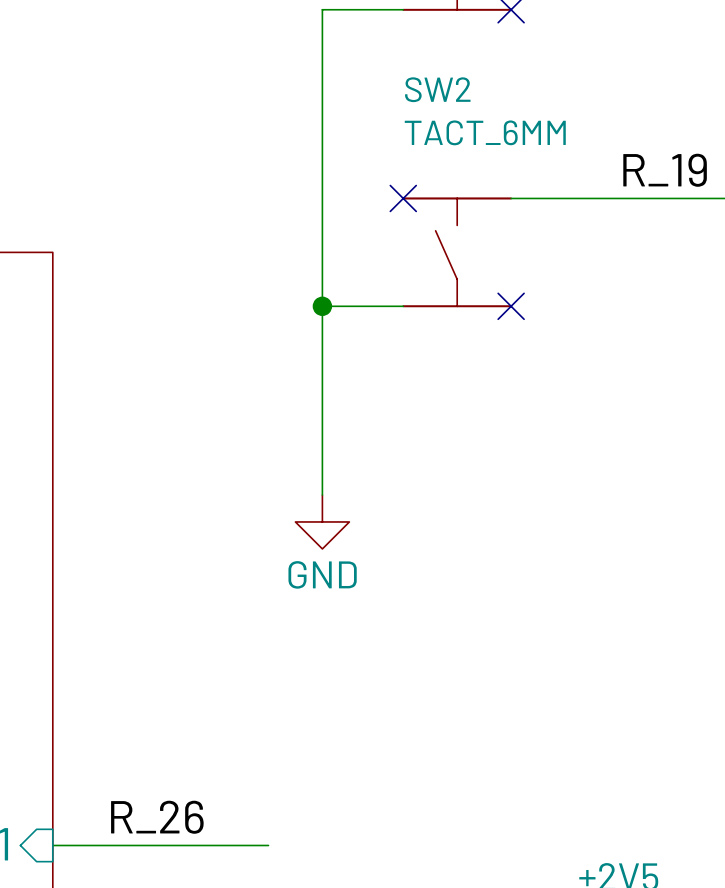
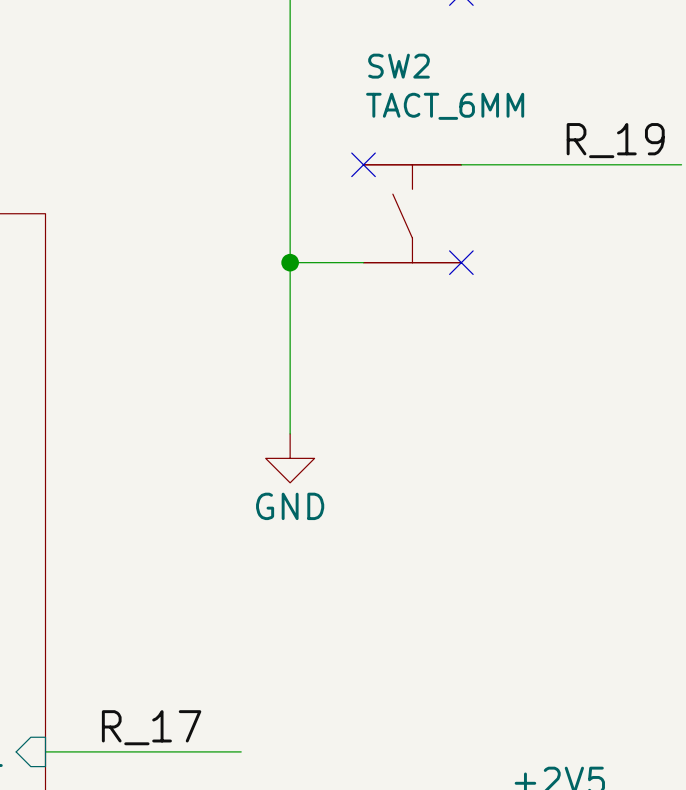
label: R_26 (157, 817) -> R_17 (151, 727)

